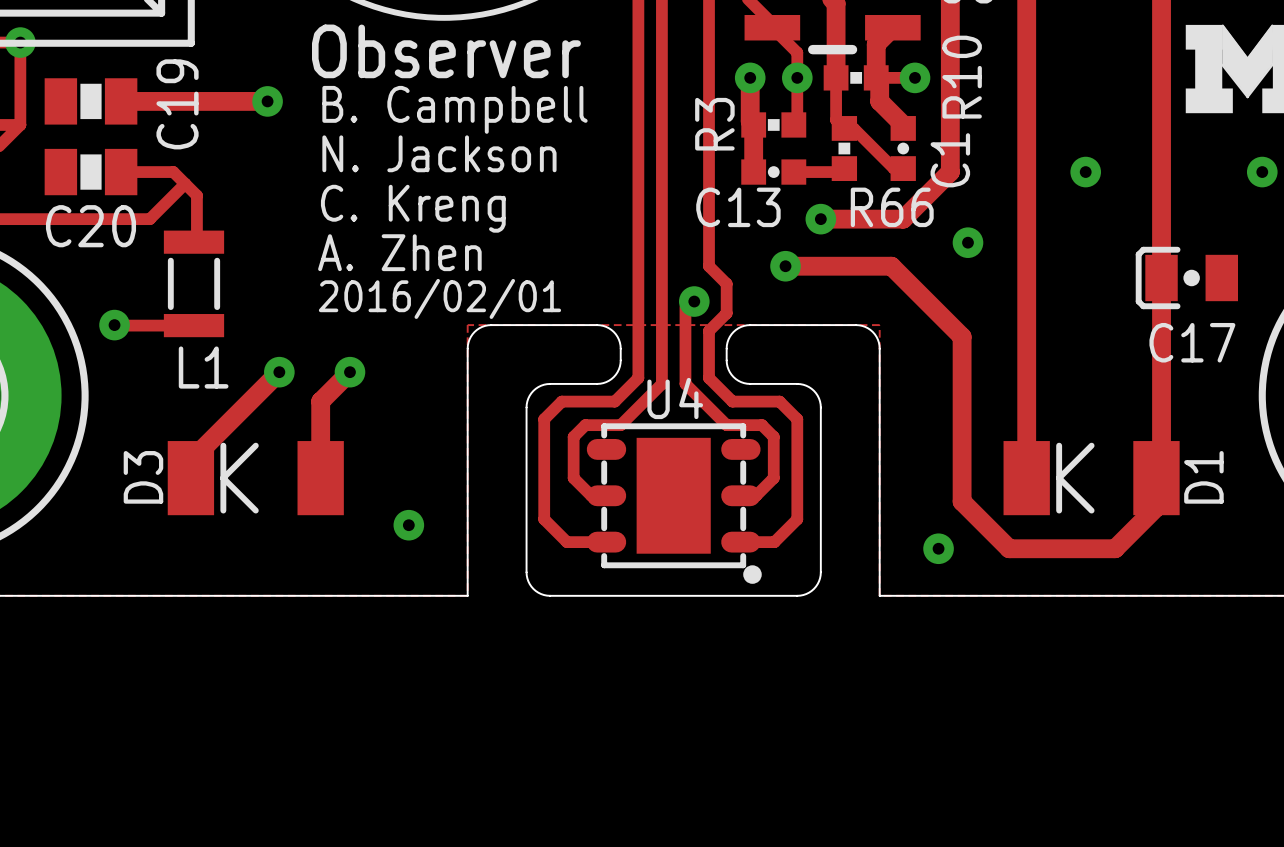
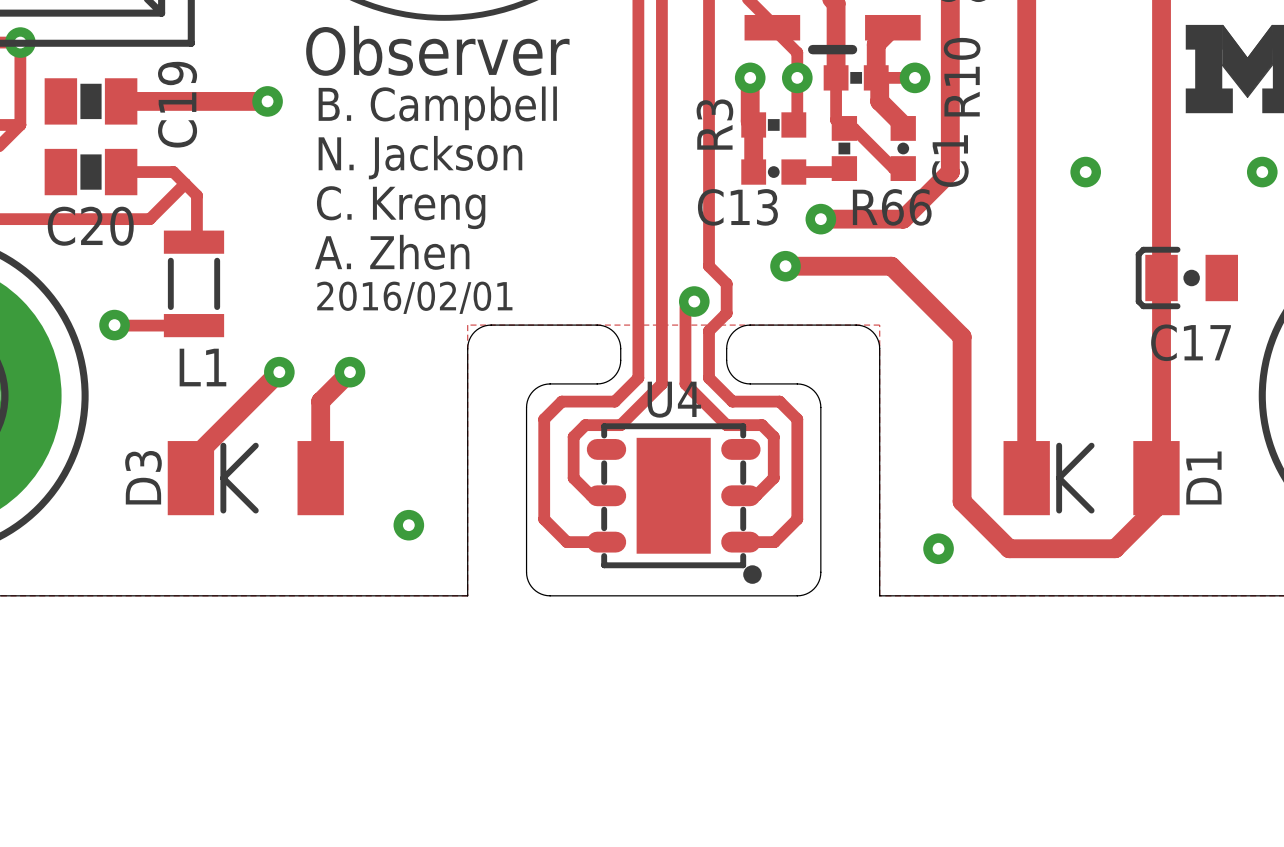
via: (967, 242) -> none

